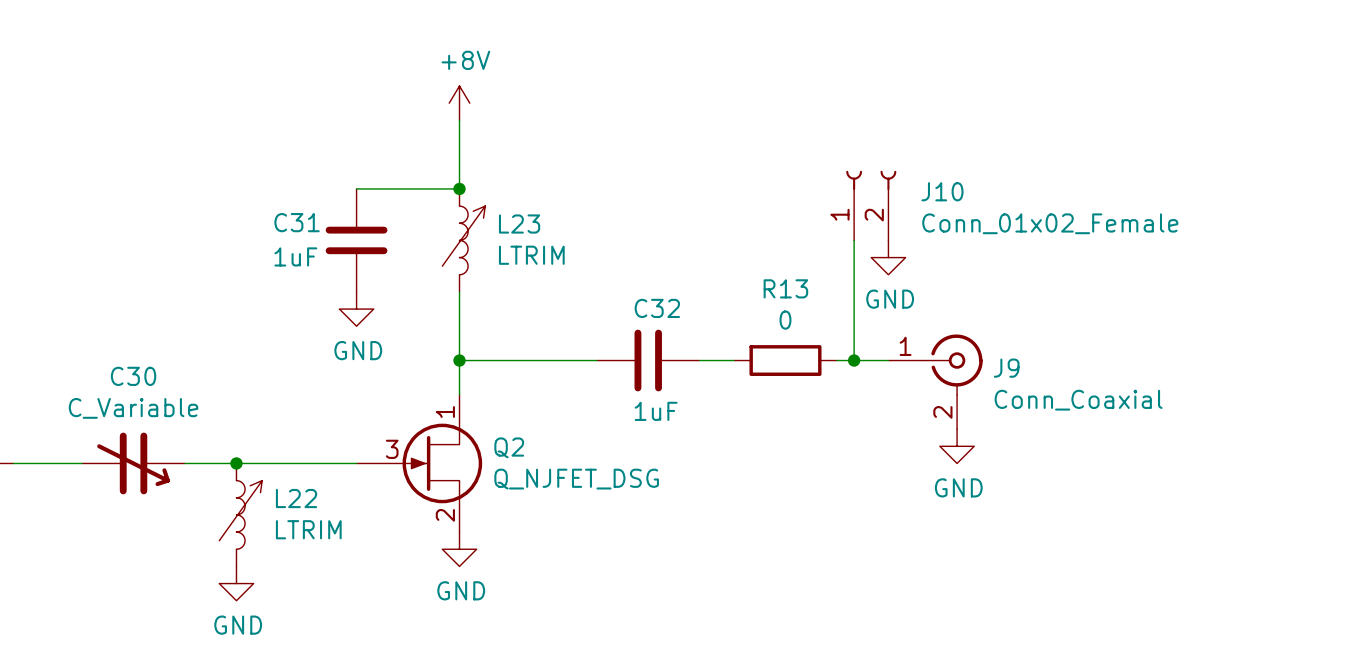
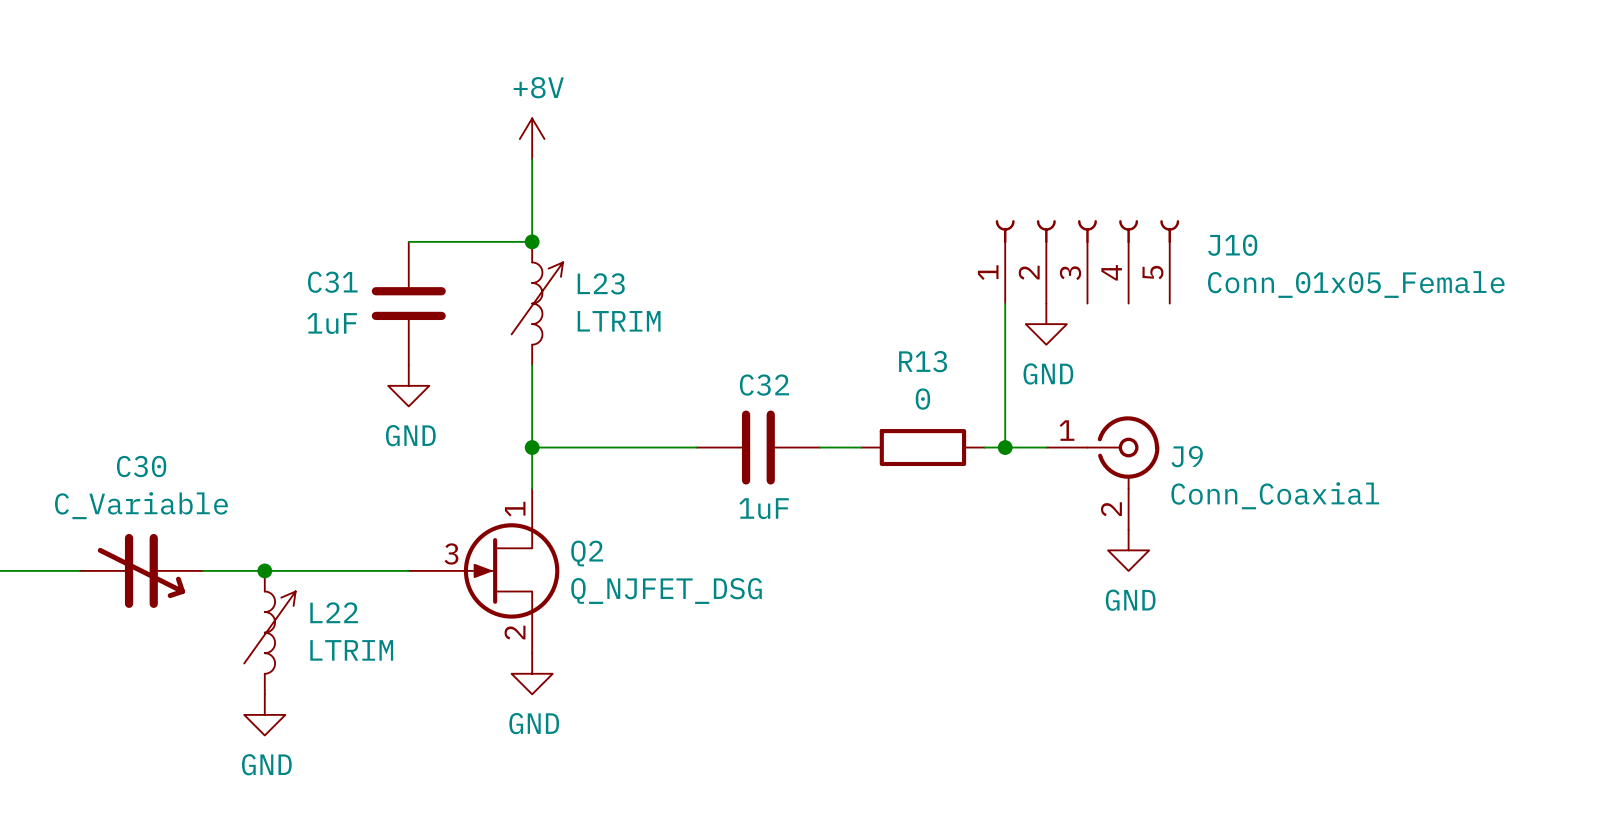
J10 symbol: [846, 170, 897, 241] -> [995, 220, 1180, 304]
J10 name position: J10 (942, 191) -> J10 (1232, 245)
J10 value: Conn_01x02_Female (1050, 223) -> Conn_01x05_Female (1356, 284)

